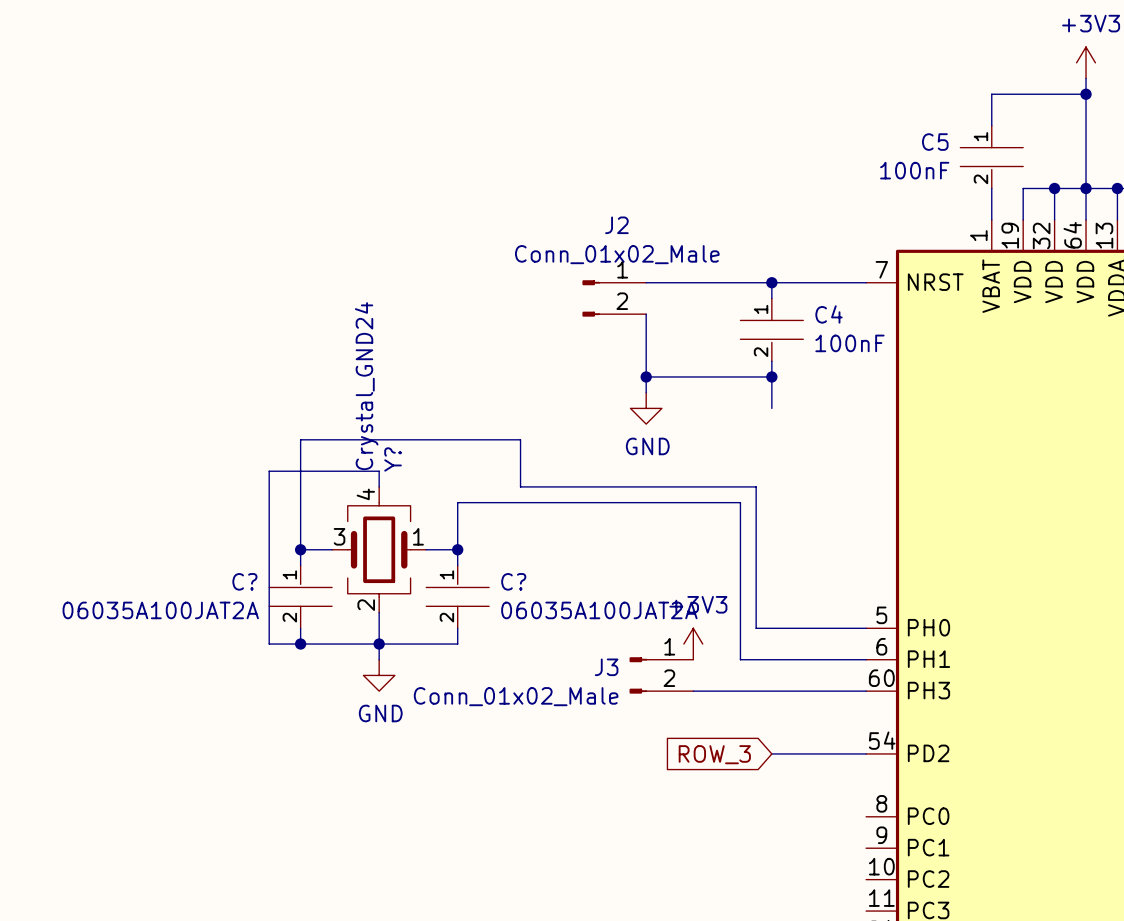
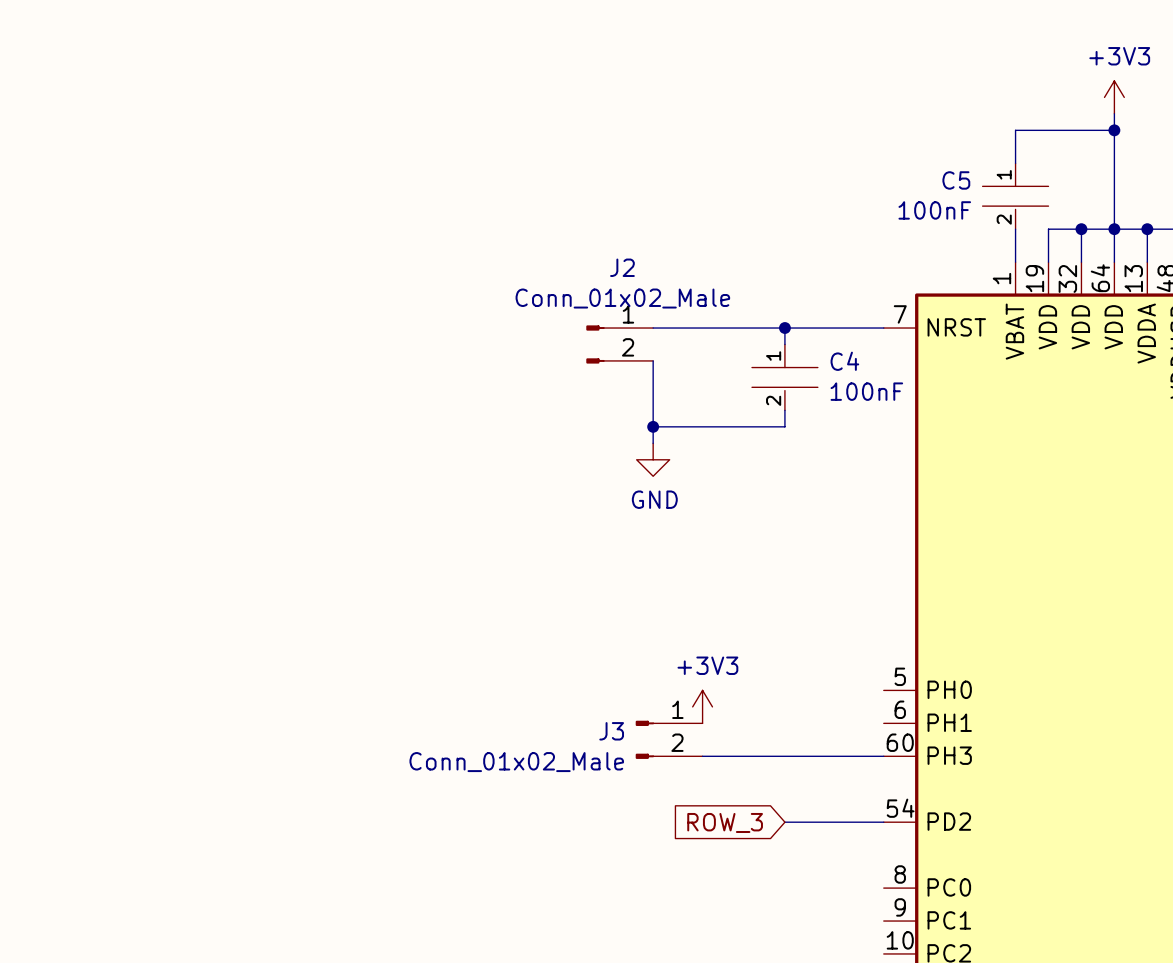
wire: (771, 376) (771, 408) -> none
junction: (771, 376) -> none
wire: (379, 486) (379, 471) (269, 471) (269, 644) (457, 644) (457, 628) -> none
wire: (300, 549) (332, 549) -> none
junction: (300, 549) -> none
Y?: Crystal_GND24 (379, 549) -> none
wire: (426, 549) (457, 549) -> none
junction: (457, 549) -> none
wire: (300, 565) (300, 439) (520, 439) (520, 486) (756, 486) (756, 628) (866, 628) -> none
wire: (457, 565) (457, 502) (740, 502) (740, 659) (866, 659) -> none
C?: 06035A100JAT2A (300, 596) -> none
C?: 06035A100JAT2A (457, 596) -> none
wire: (379, 612) (379, 659) -> none
wire: (300, 628) (300, 644) -> none
junction: (300, 644) -> none
junction: (379, 644) -> none
power symbol: GND (379, 675) -> none

